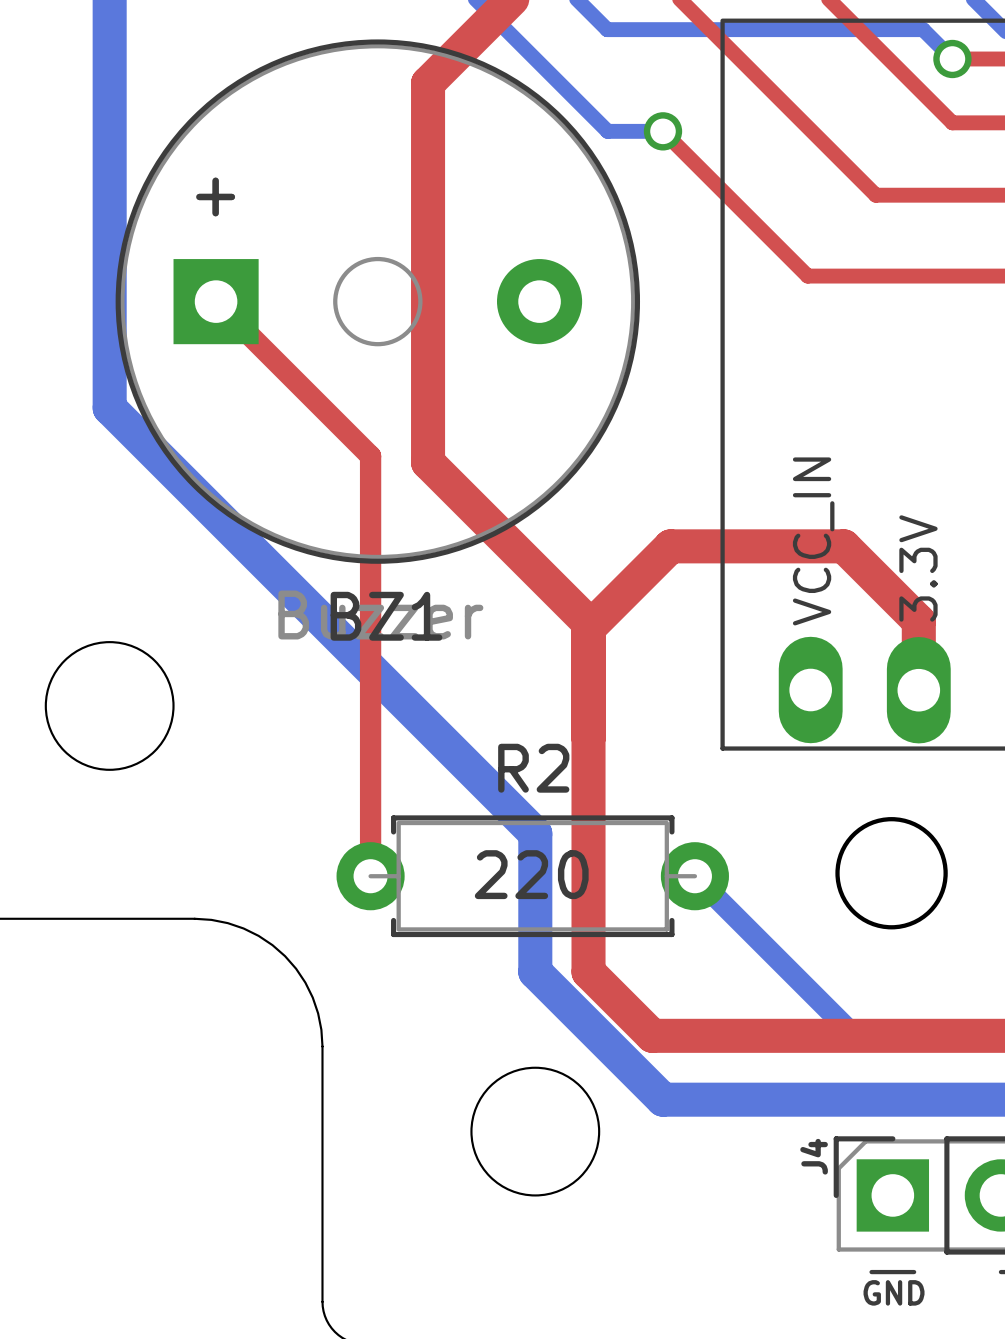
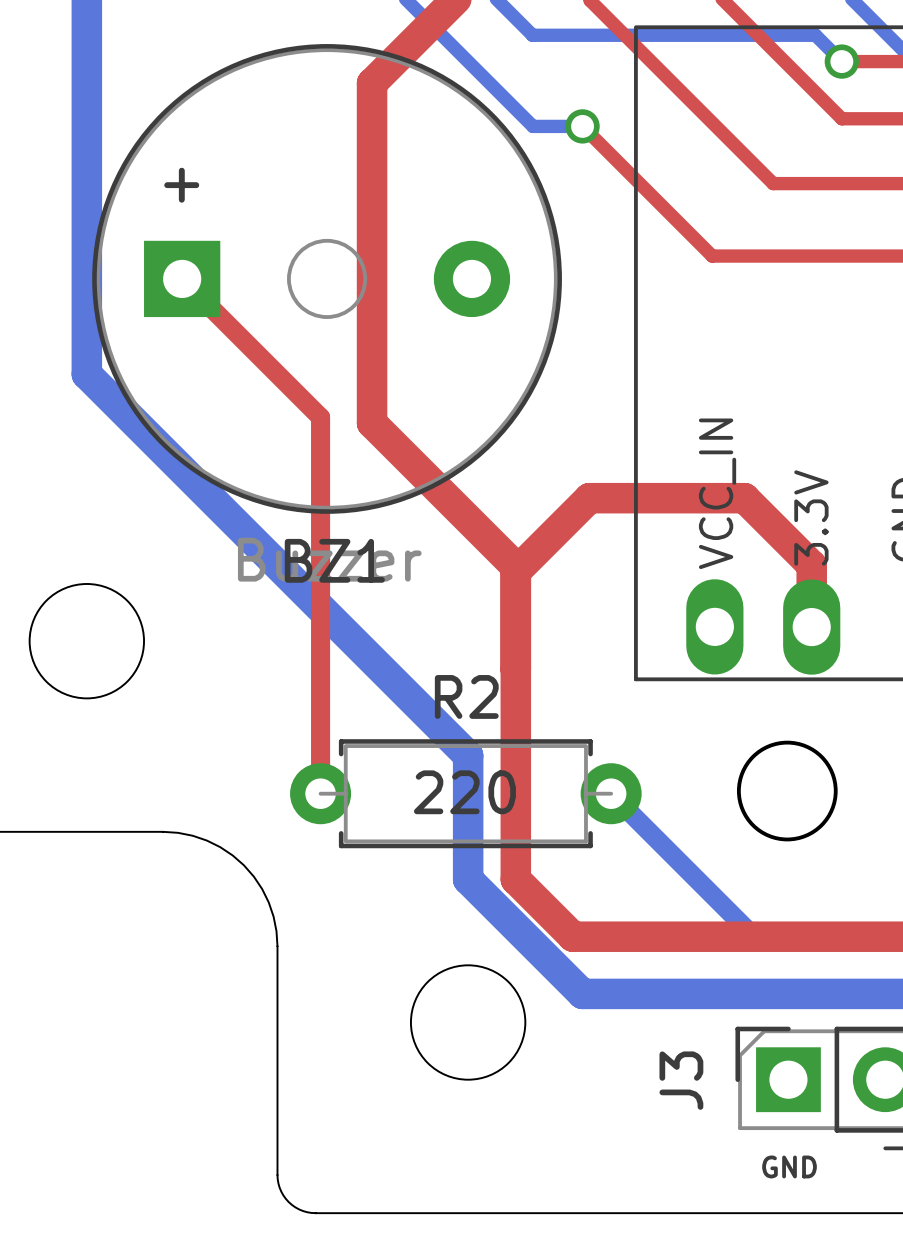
J4 name: J4 (814, 1156) -> J3 (681, 1080)
line: (871, 1272) (914, 1272) -> none

